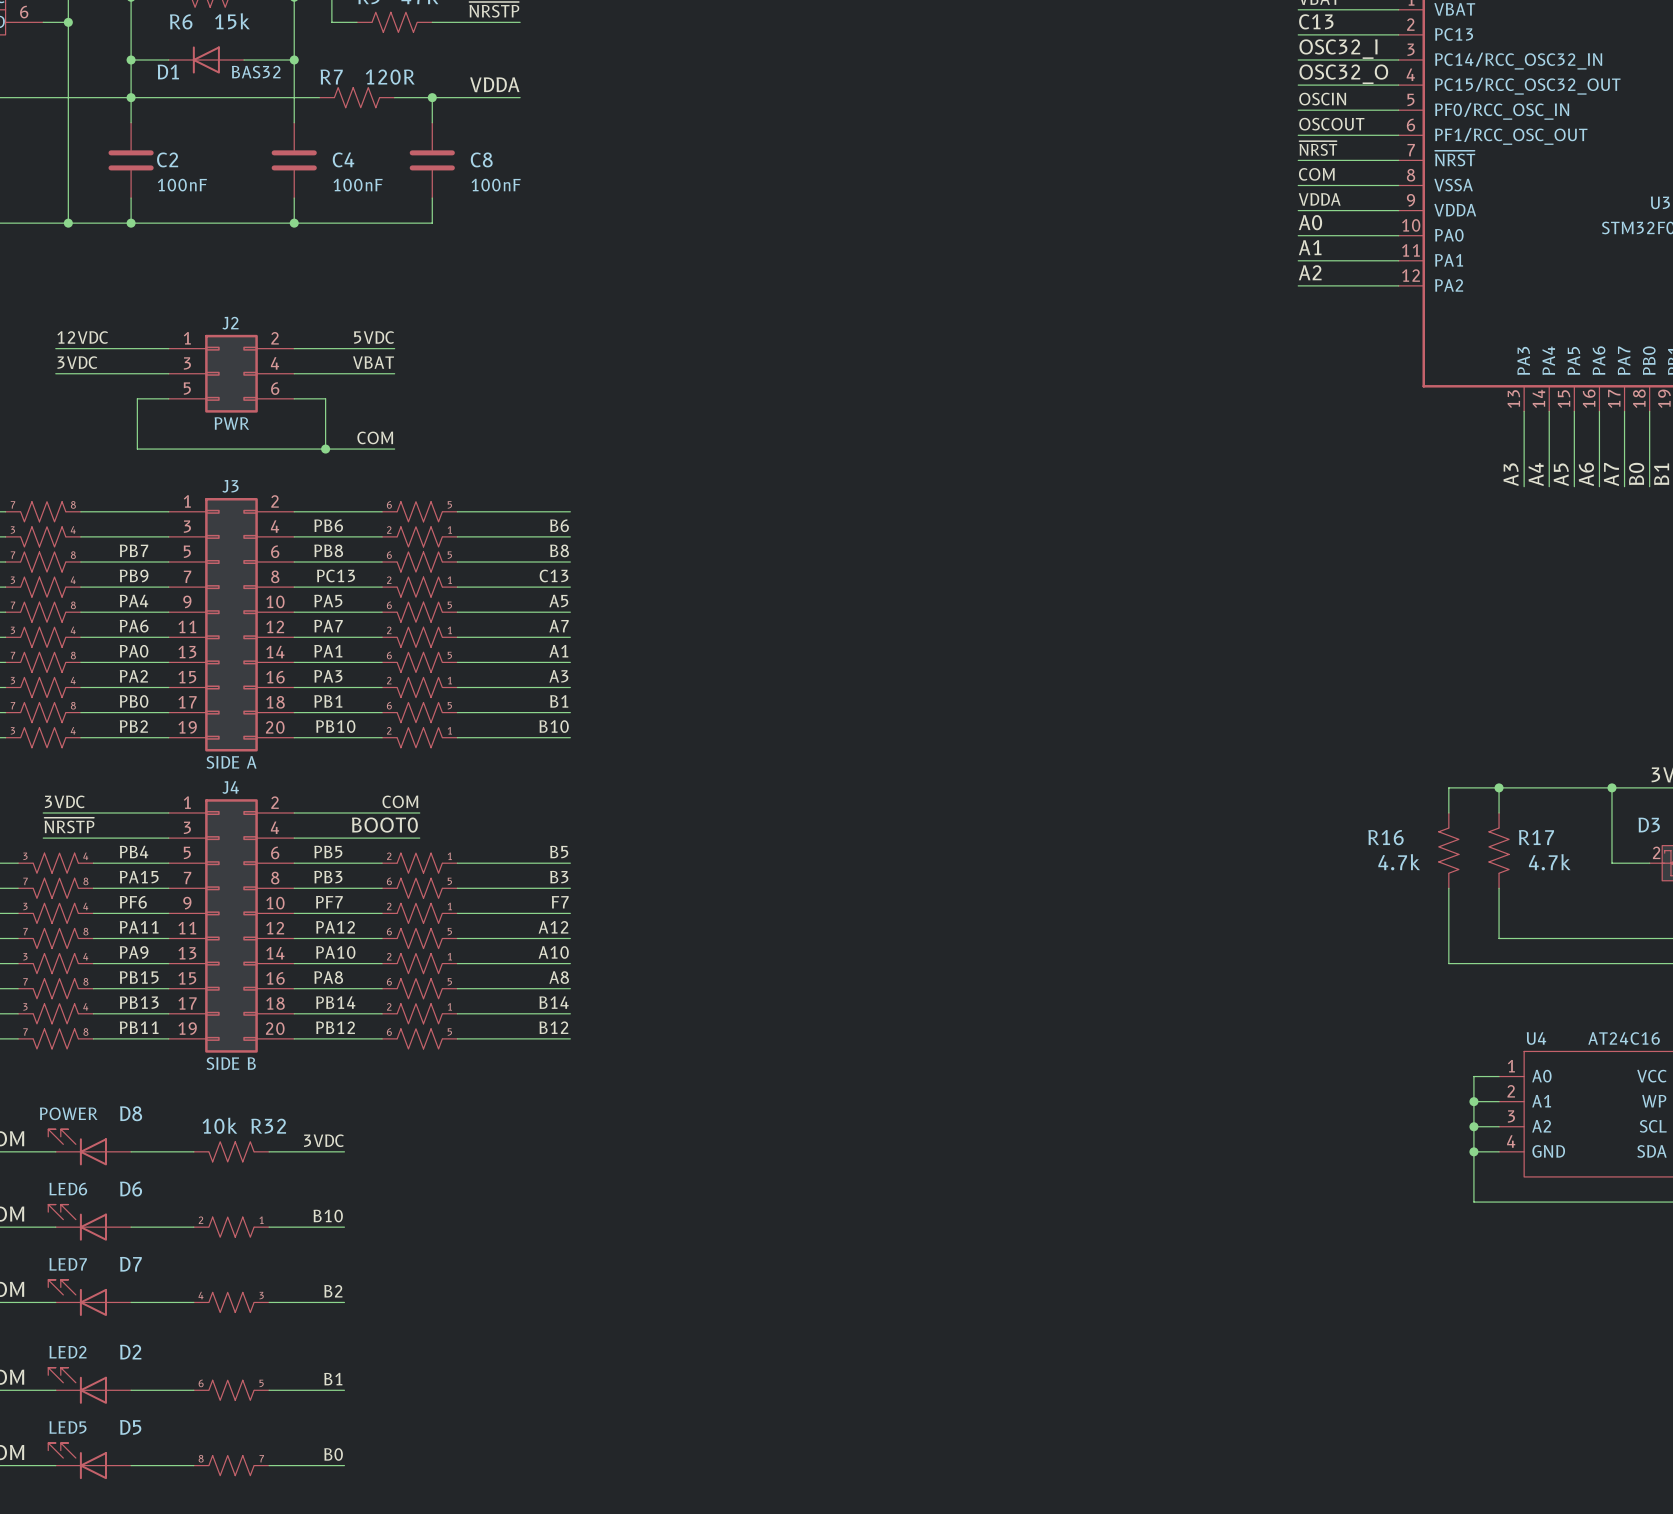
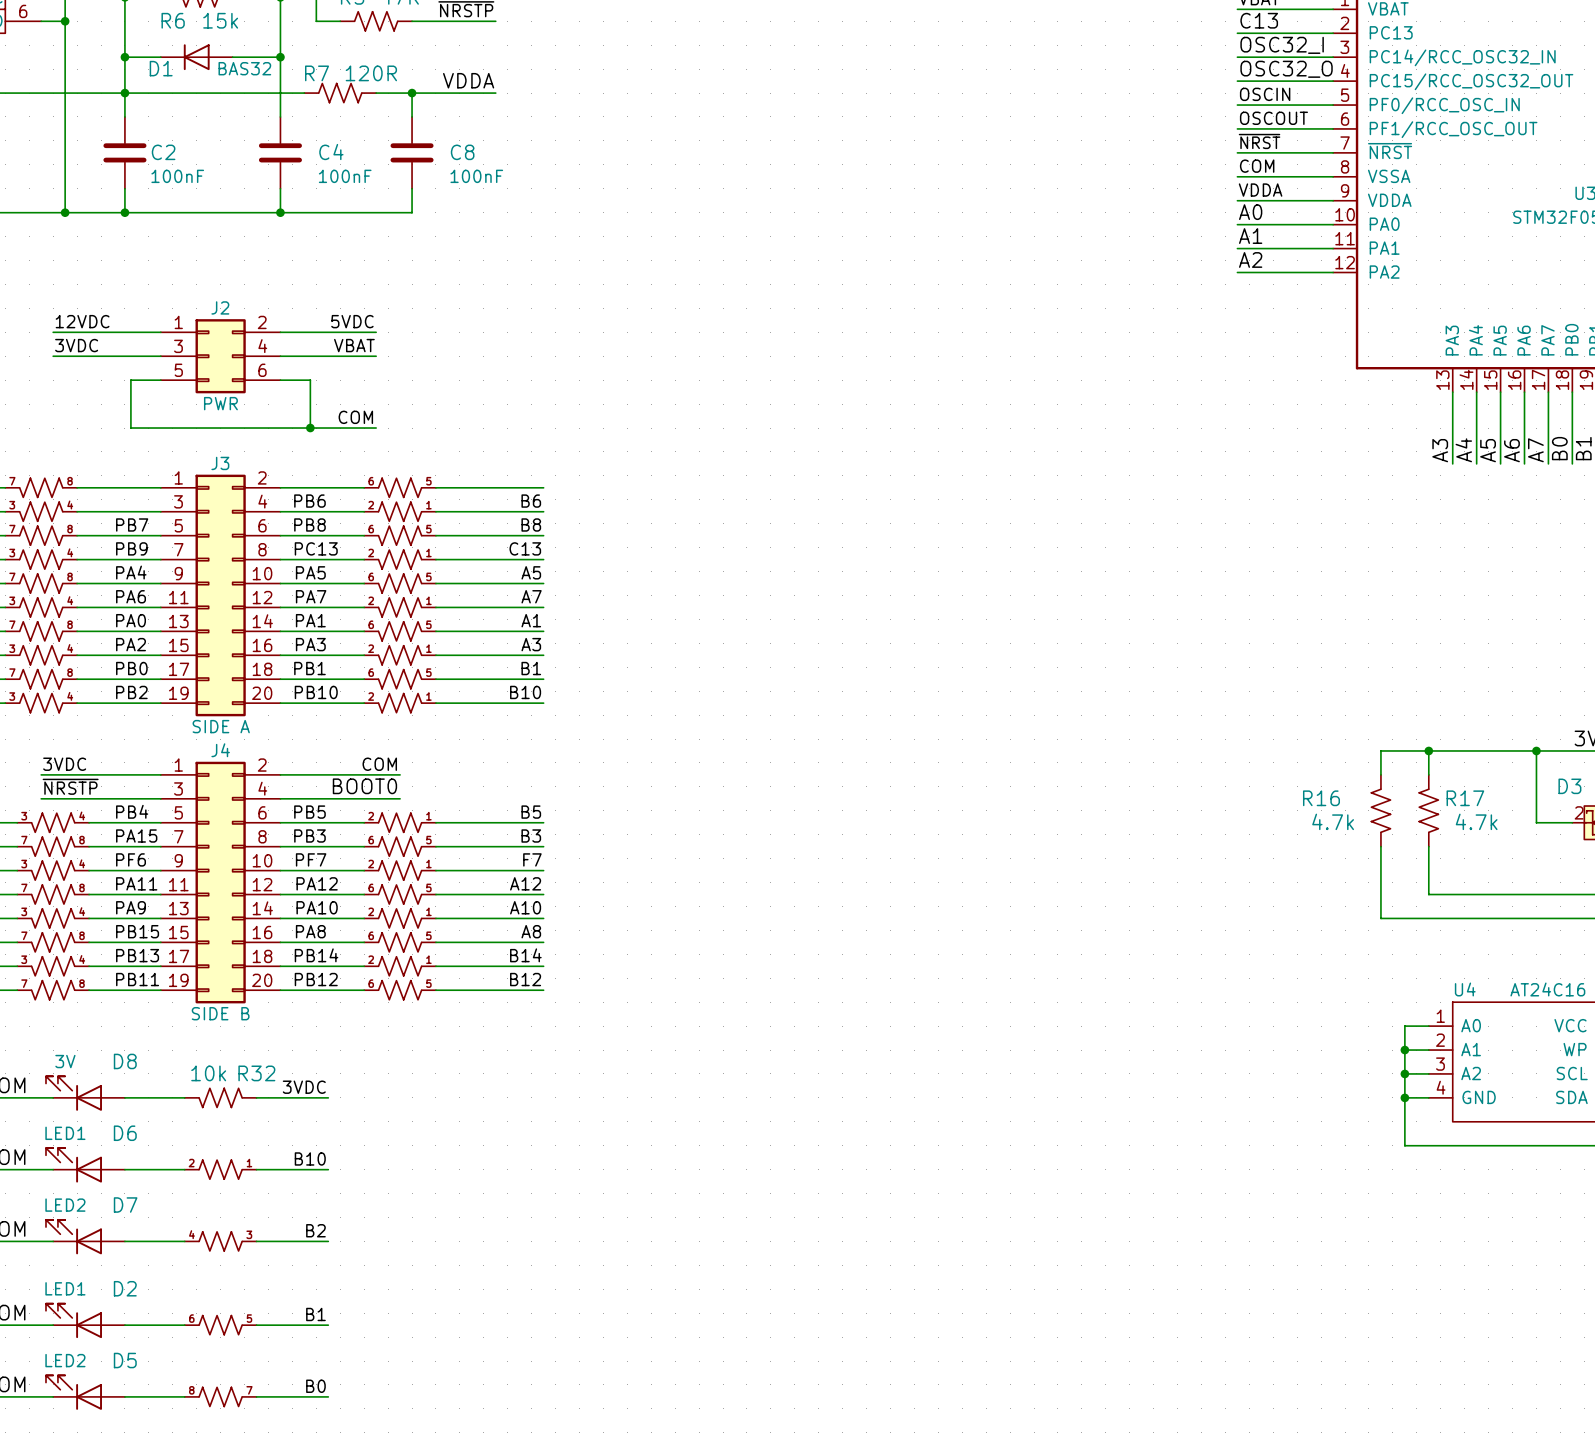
D8 value: POWER (68, 1113) -> 3V (65, 1061)
D6 value: LED6 (68, 1189) -> LED1 (65, 1133)
D7 value: LED7 (68, 1264) -> LED2 (65, 1205)
D2 value: LED2 (67, 1352) -> LED1 (65, 1288)
D5 value: LED5 (67, 1427) -> LED2 (65, 1360)

